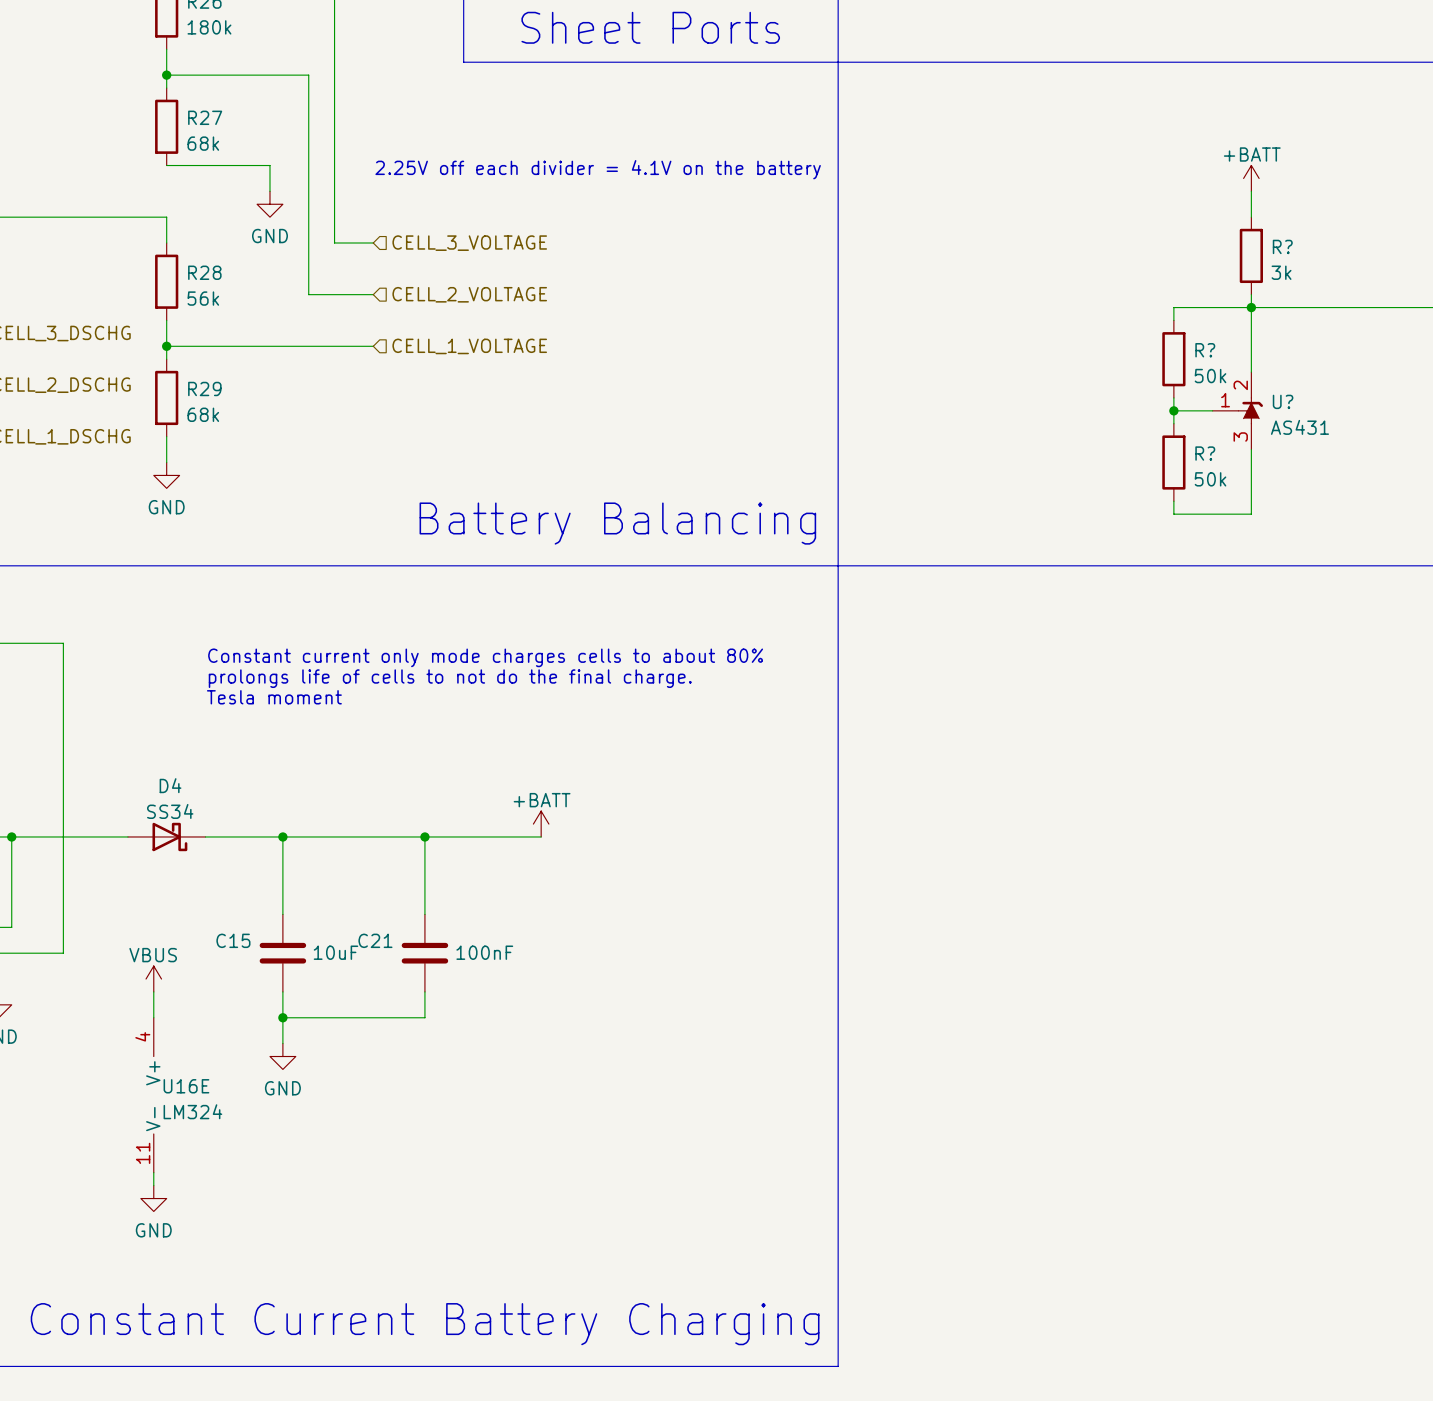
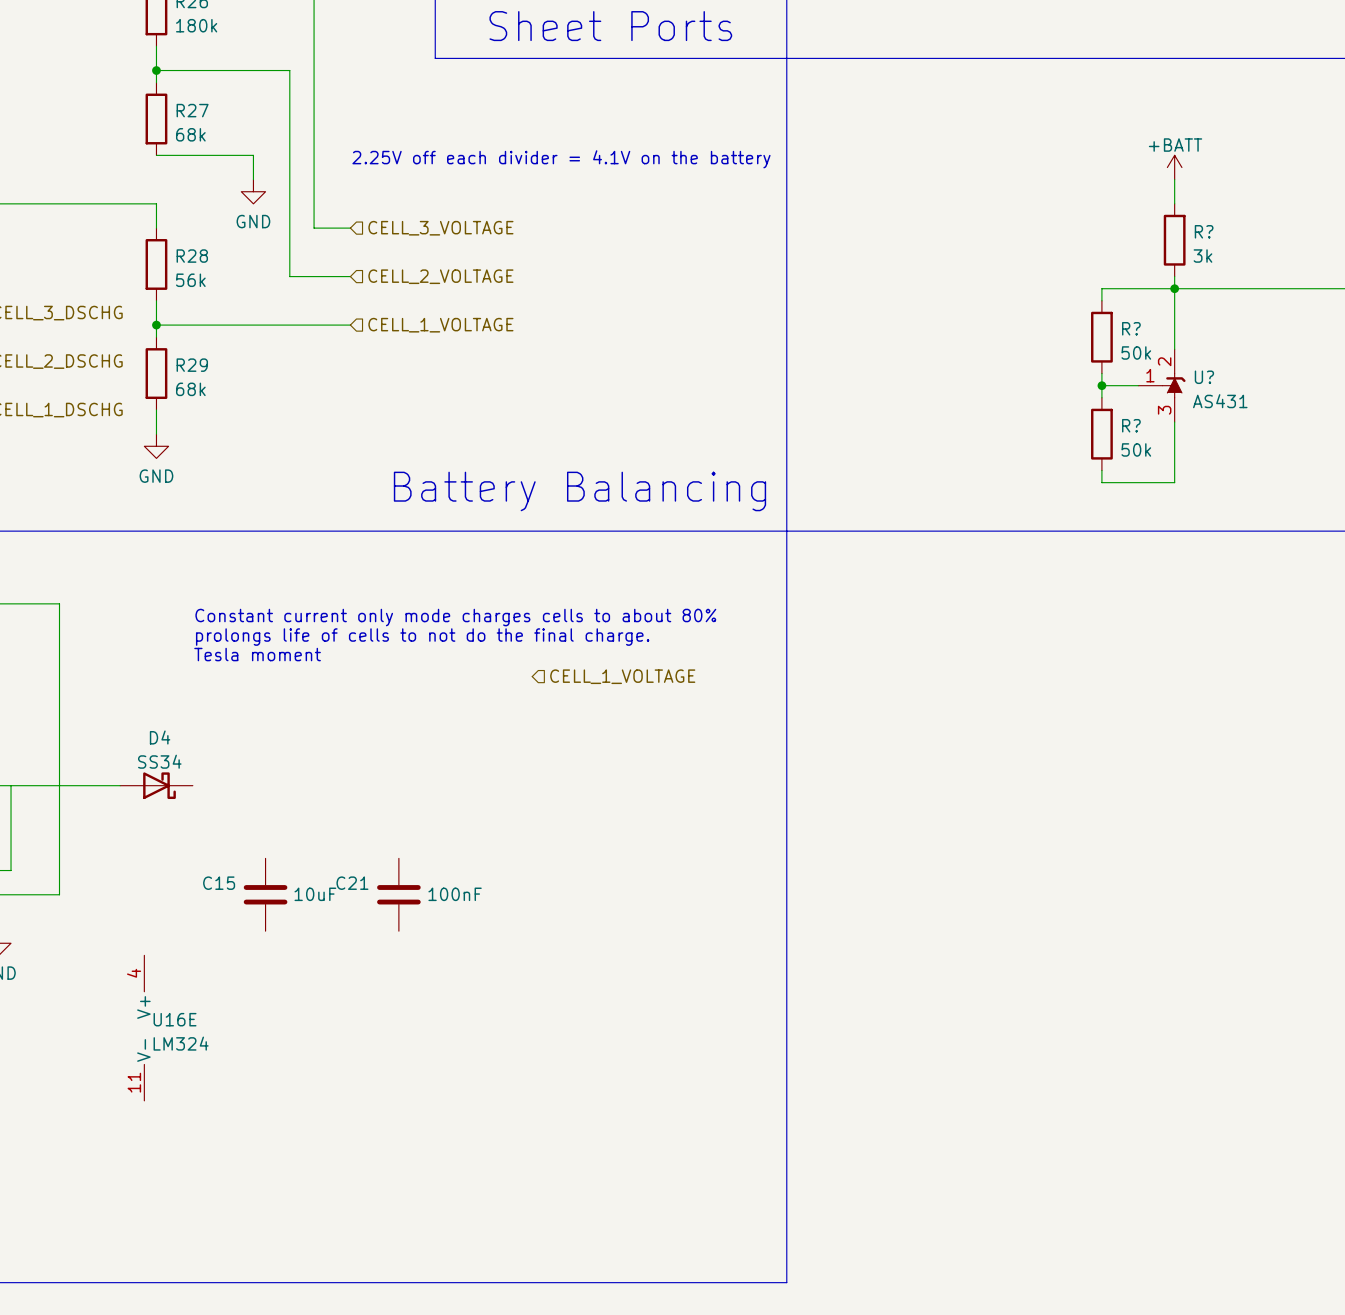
hierarchical label: none -> CELL_1_VOLTAGE (622, 676)
power symbol: +BATT (541, 824) -> none
junction: (11, 836) -> none
wire: (205, 836) (541, 836) -> none
wire: (282, 836) (282, 914) -> none
junction: (282, 836) -> none
wire: (424, 836) (424, 914) -> none
junction: (424, 836) -> none
power symbol: VBUS (153, 979) -> none
wire: (153, 991) (153, 1017) -> none
wire: (282, 991) (282, 1043) -> none
wire: (424, 991) (424, 1017) (282, 1017) -> none
junction: (282, 1017) -> none
power symbol: GND (282, 1056) -> none
wire: (153, 1172) (153, 1185) -> none
power symbol: GND (153, 1198) -> none
text: Constant Current Battery Charging (425, 1324) -> none

